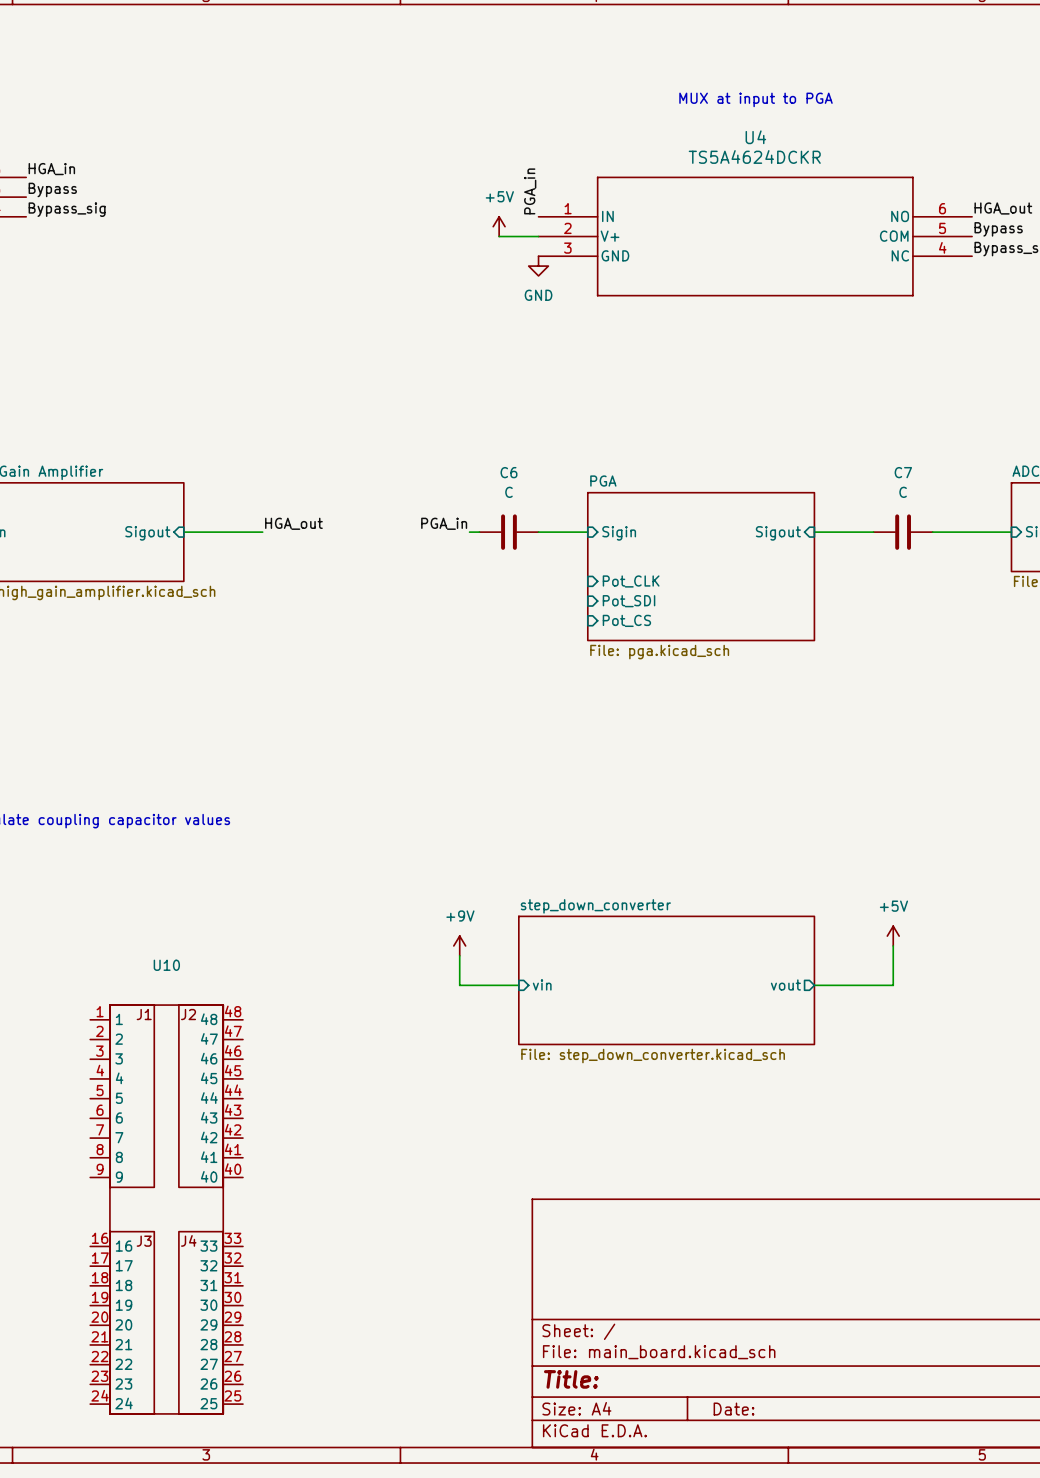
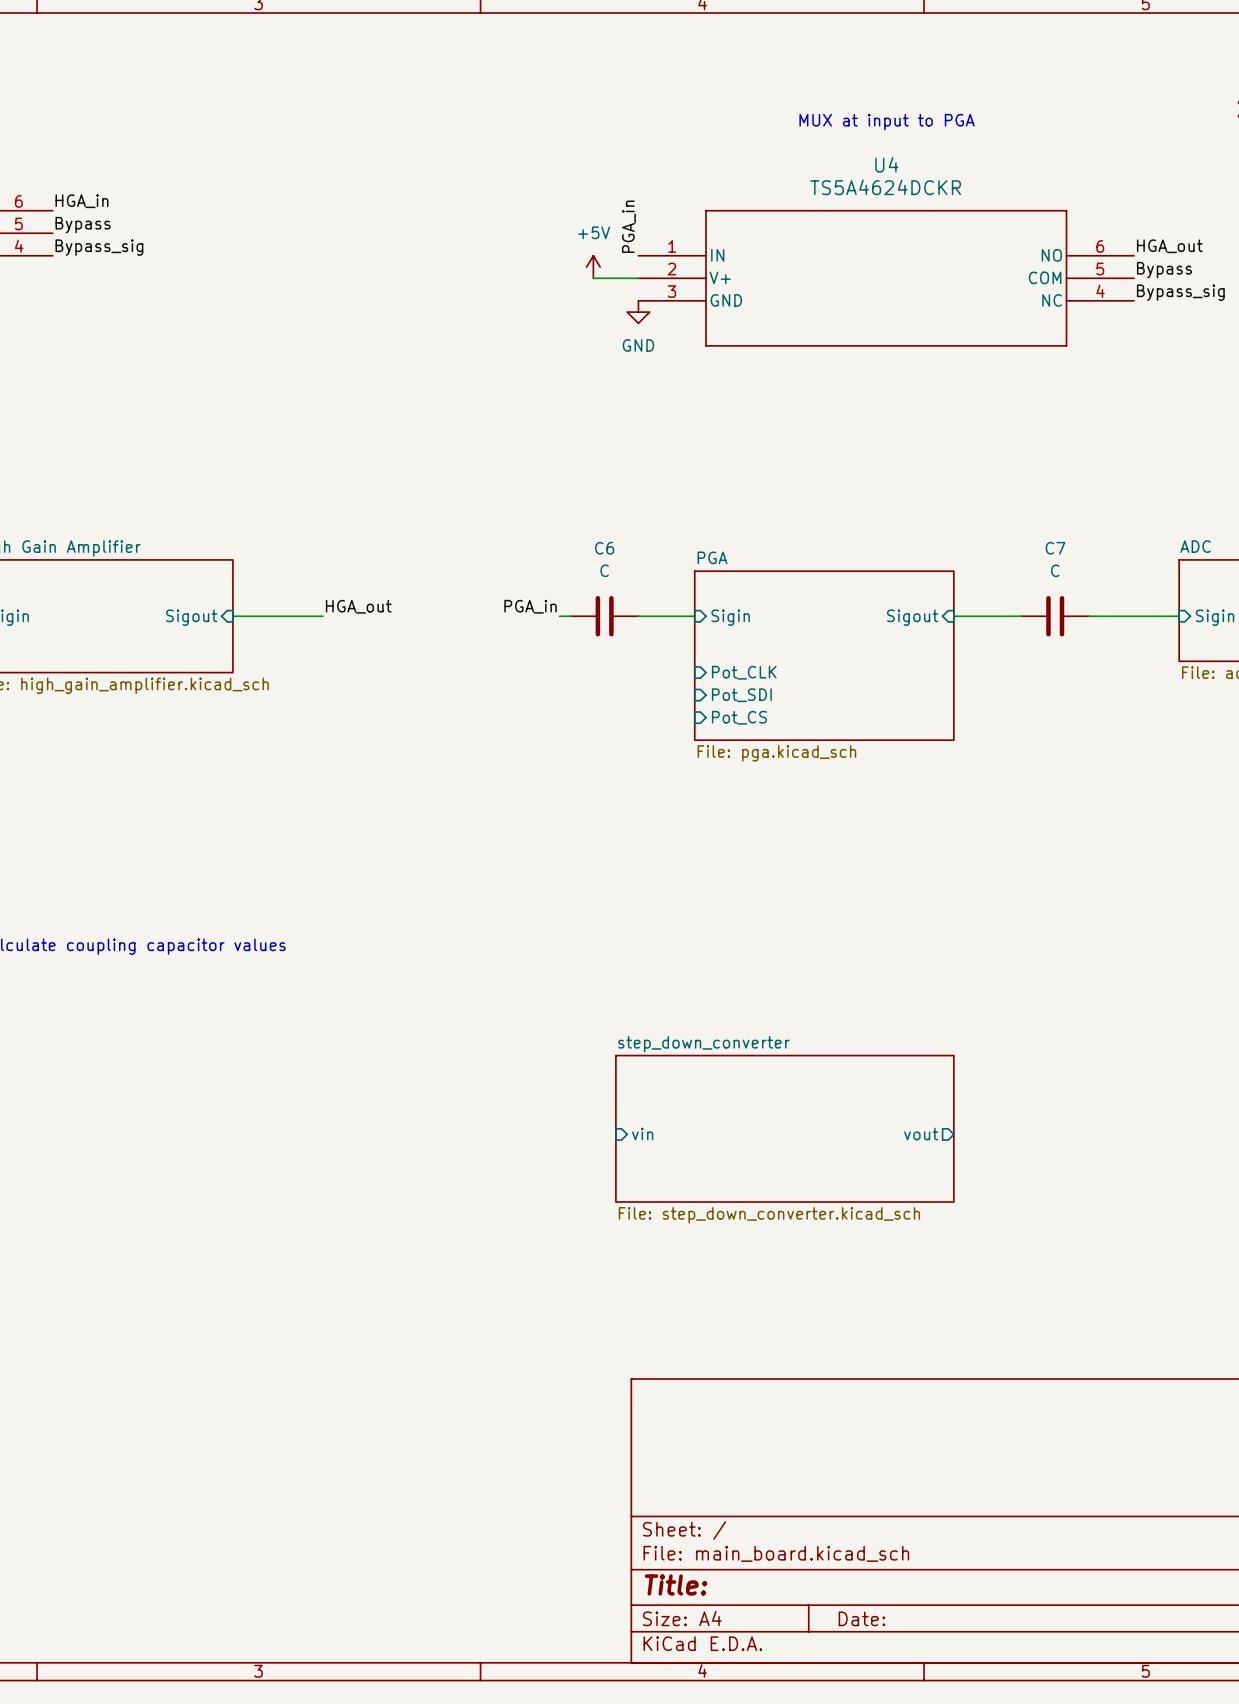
power symbol: +5V (893, 936) -> none
power symbol: +9V (459, 945) -> none
wire: (893, 945) (893, 985) (814, 985) -> none
wire: (459, 955) (459, 985) (518, 985) -> none
U10: (166, 1209) -> none

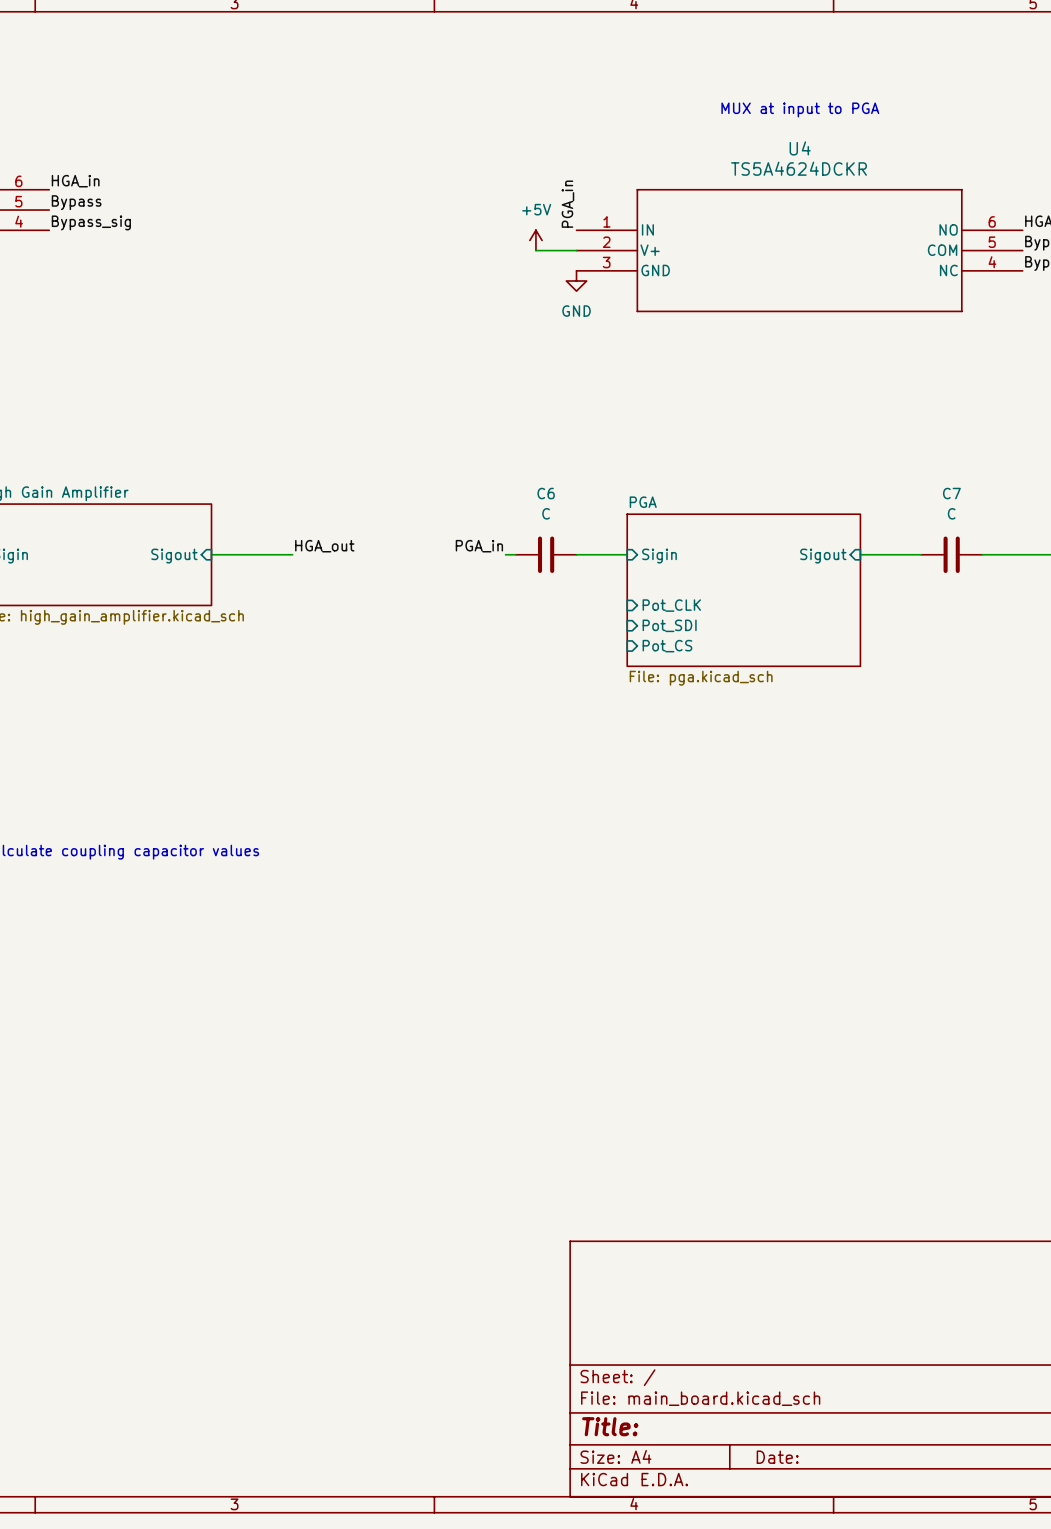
sheet step_down_converter: File: step_down_converter.kicad_sch (784, 1128) -> none
sheet pin: vin (642, 1134) -> none
sheet pin: vout (921, 1134) -> none

